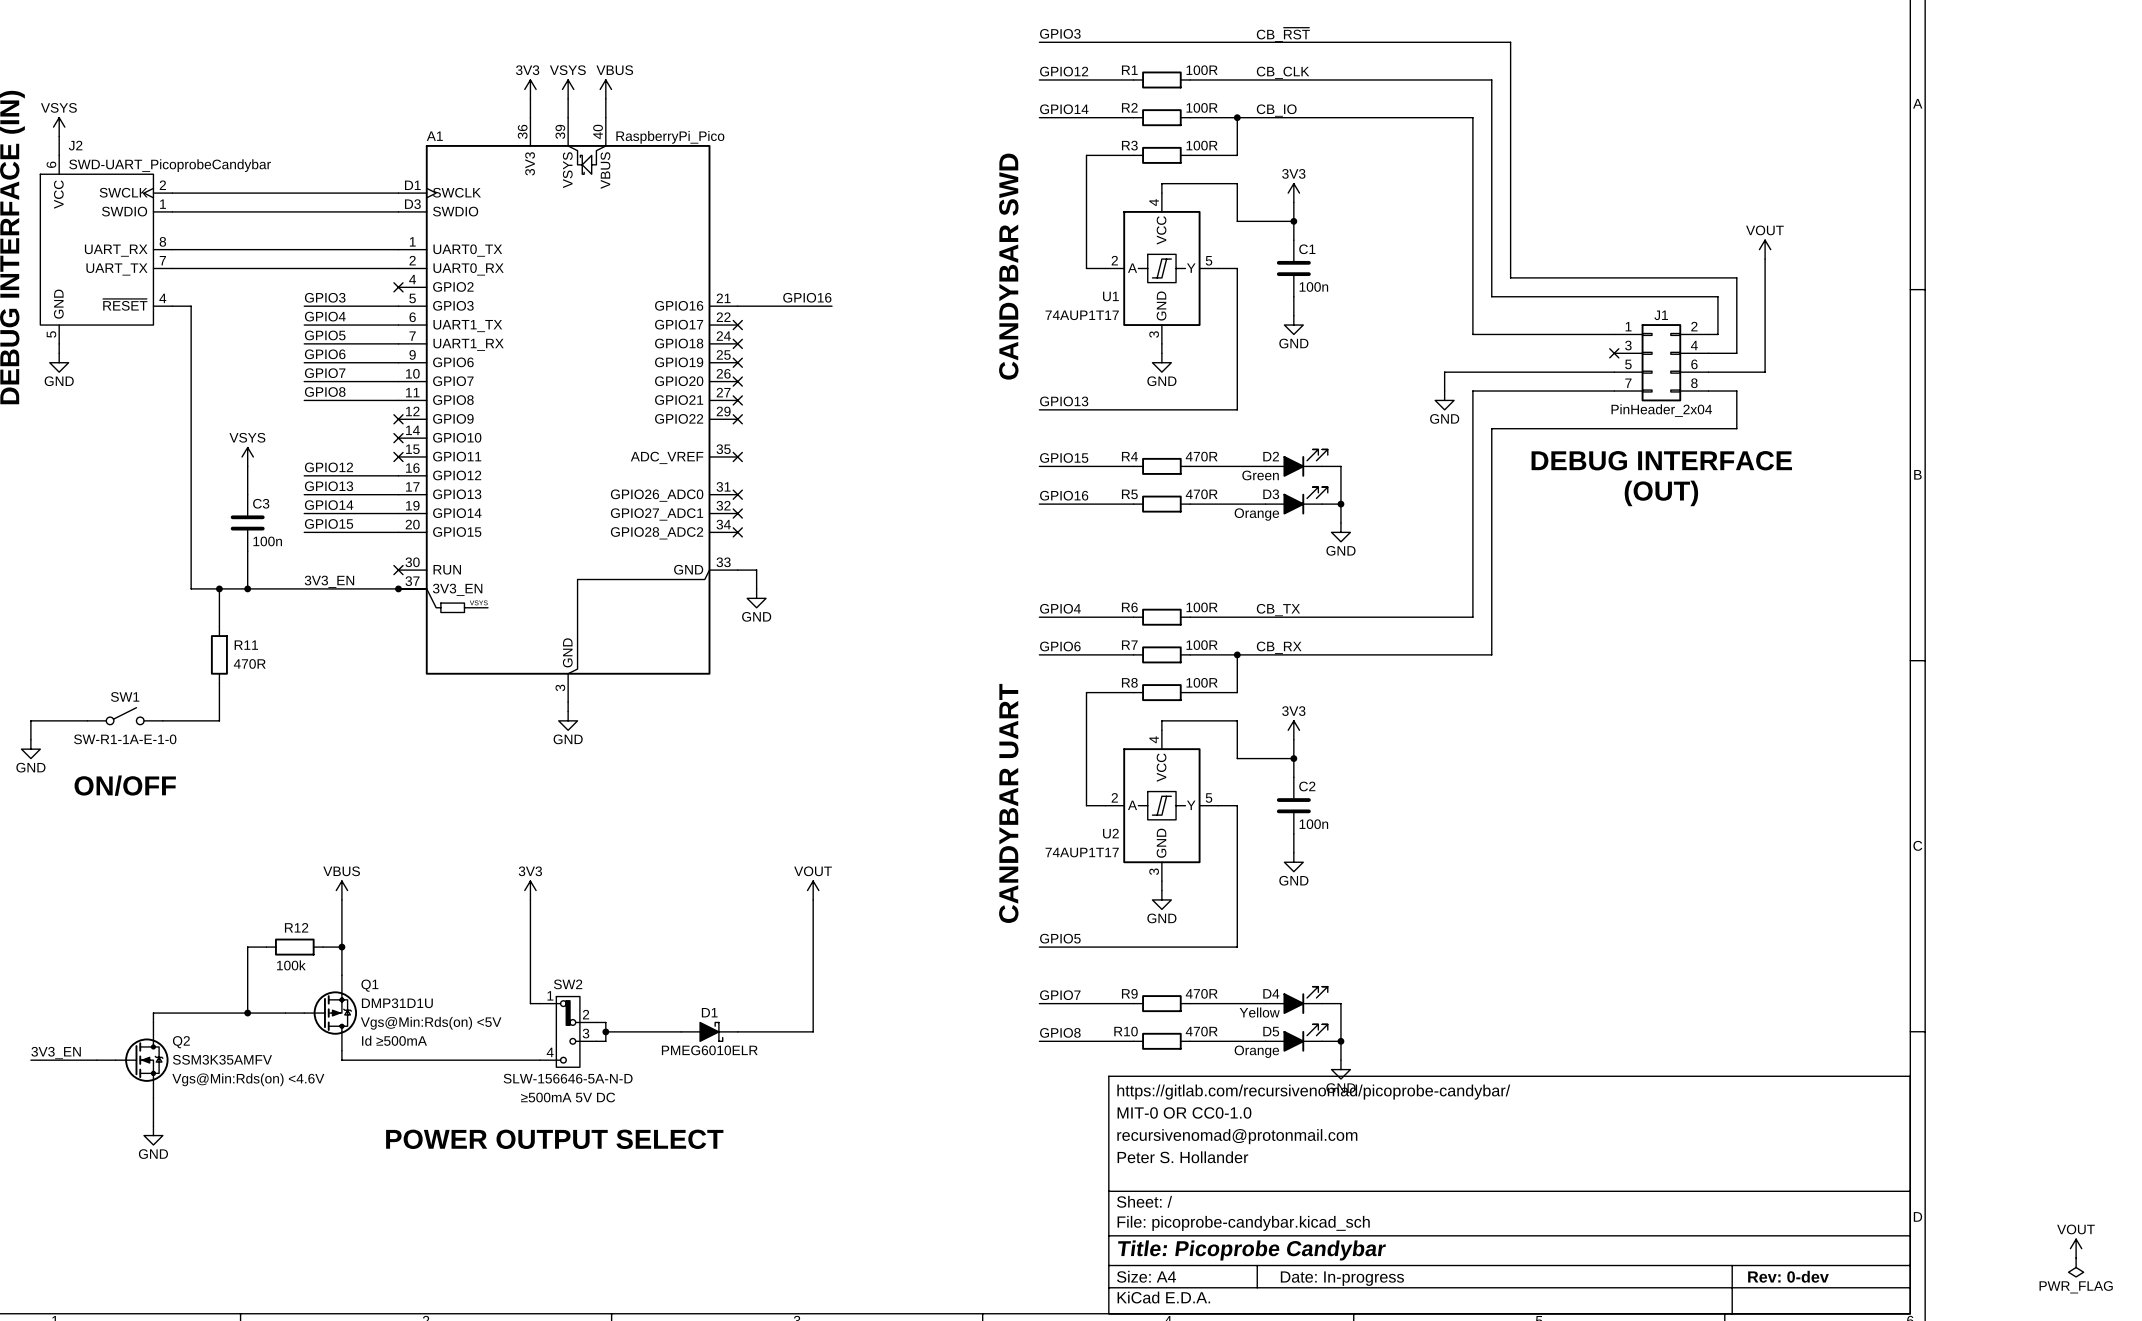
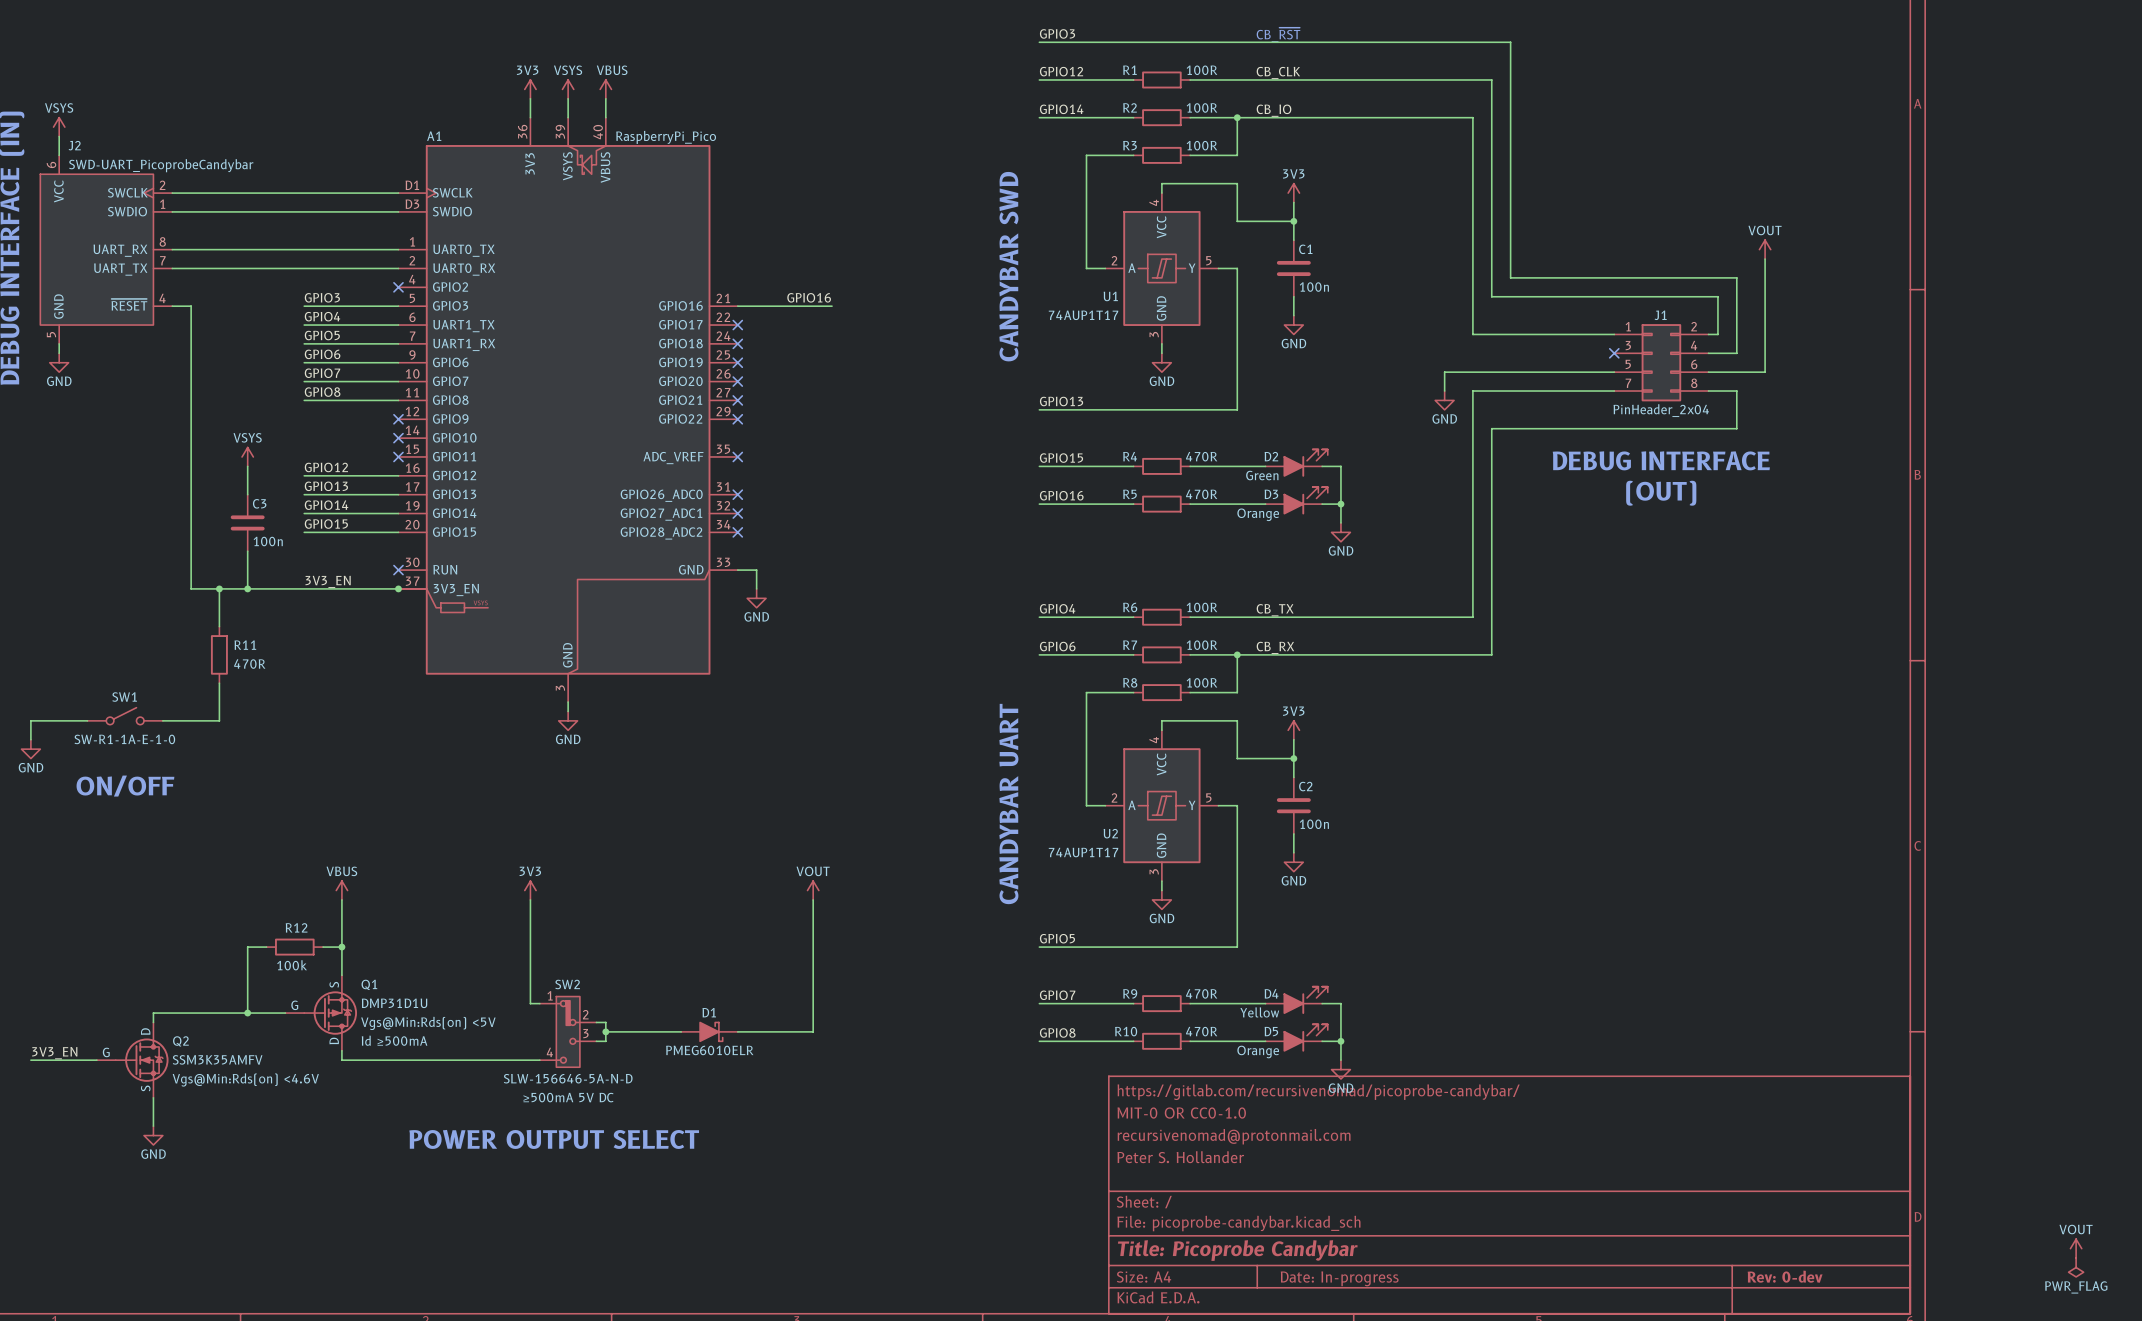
Q1 pin name: none -> S (334, 984)
Q1 pin name: none -> G (294, 1005)
Q2 pin name: none -> D (145, 1031)
Q1 pin name: none -> D (334, 1040)
Q2 pin name: none -> G (106, 1052)
Q2 pin name: none -> S (145, 1088)

